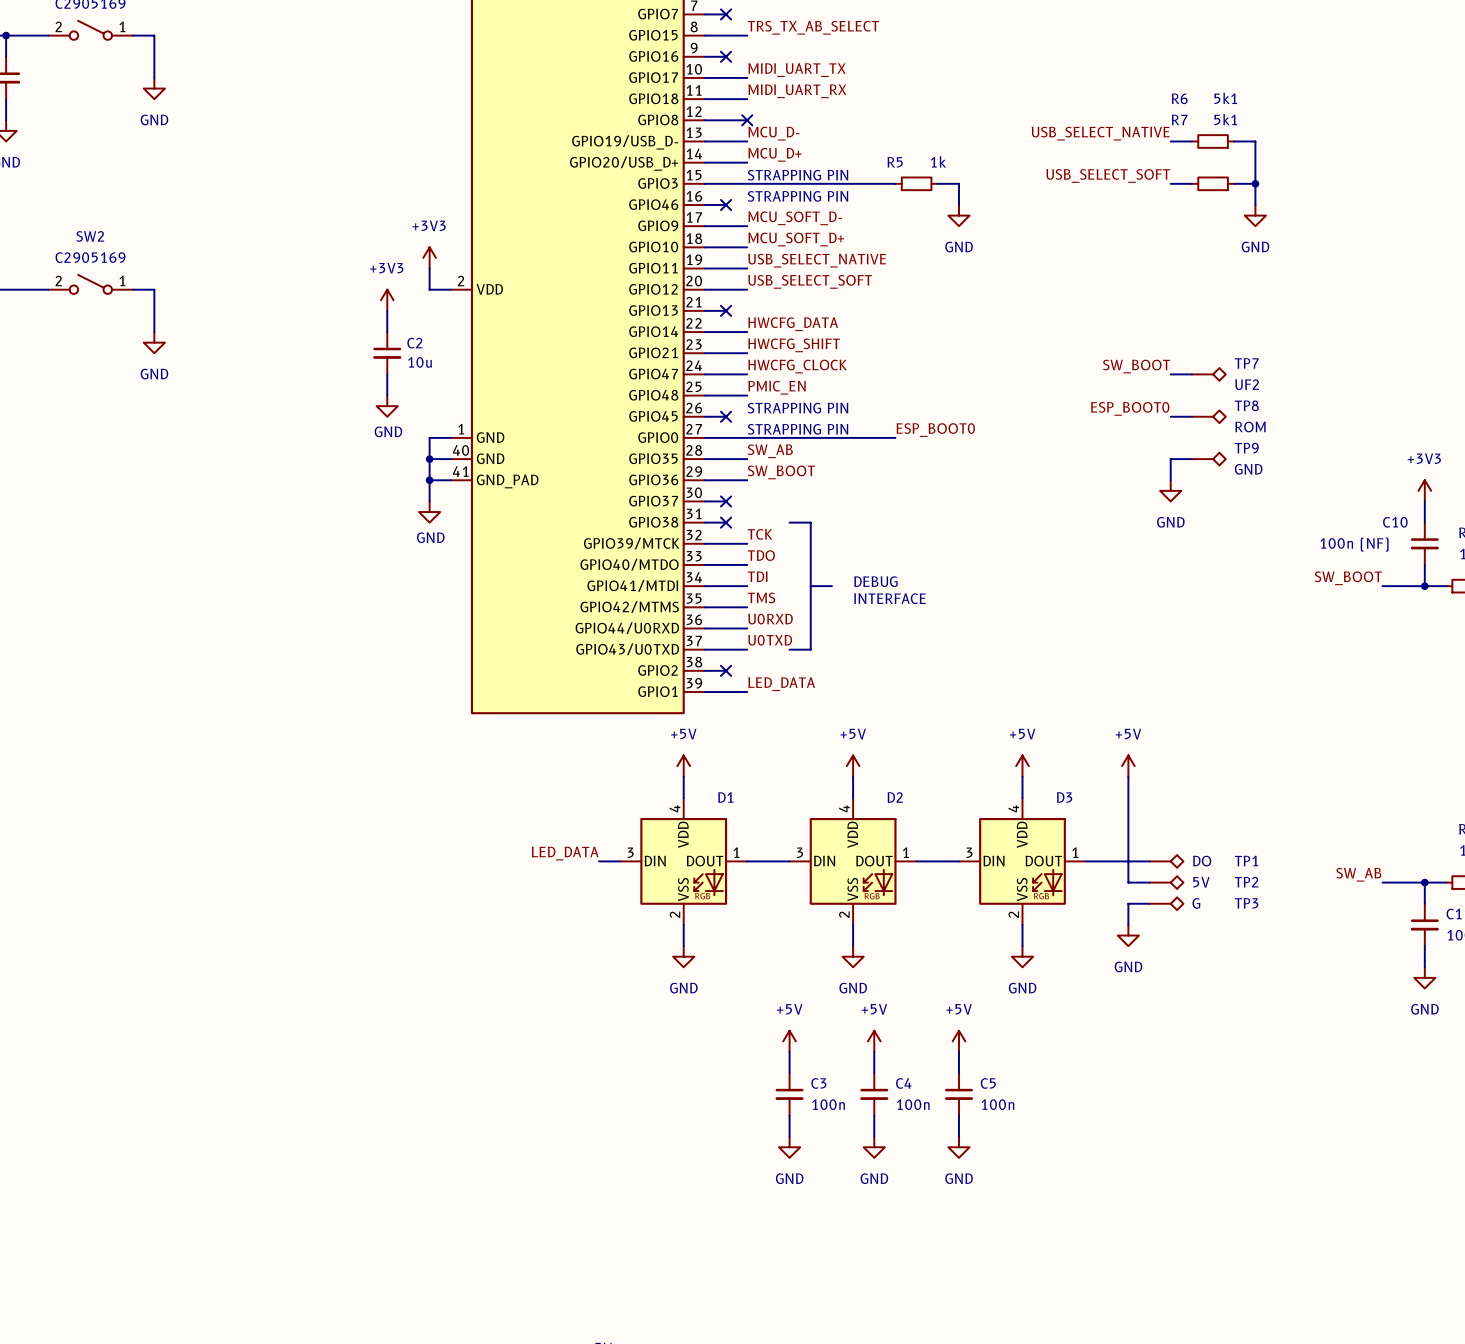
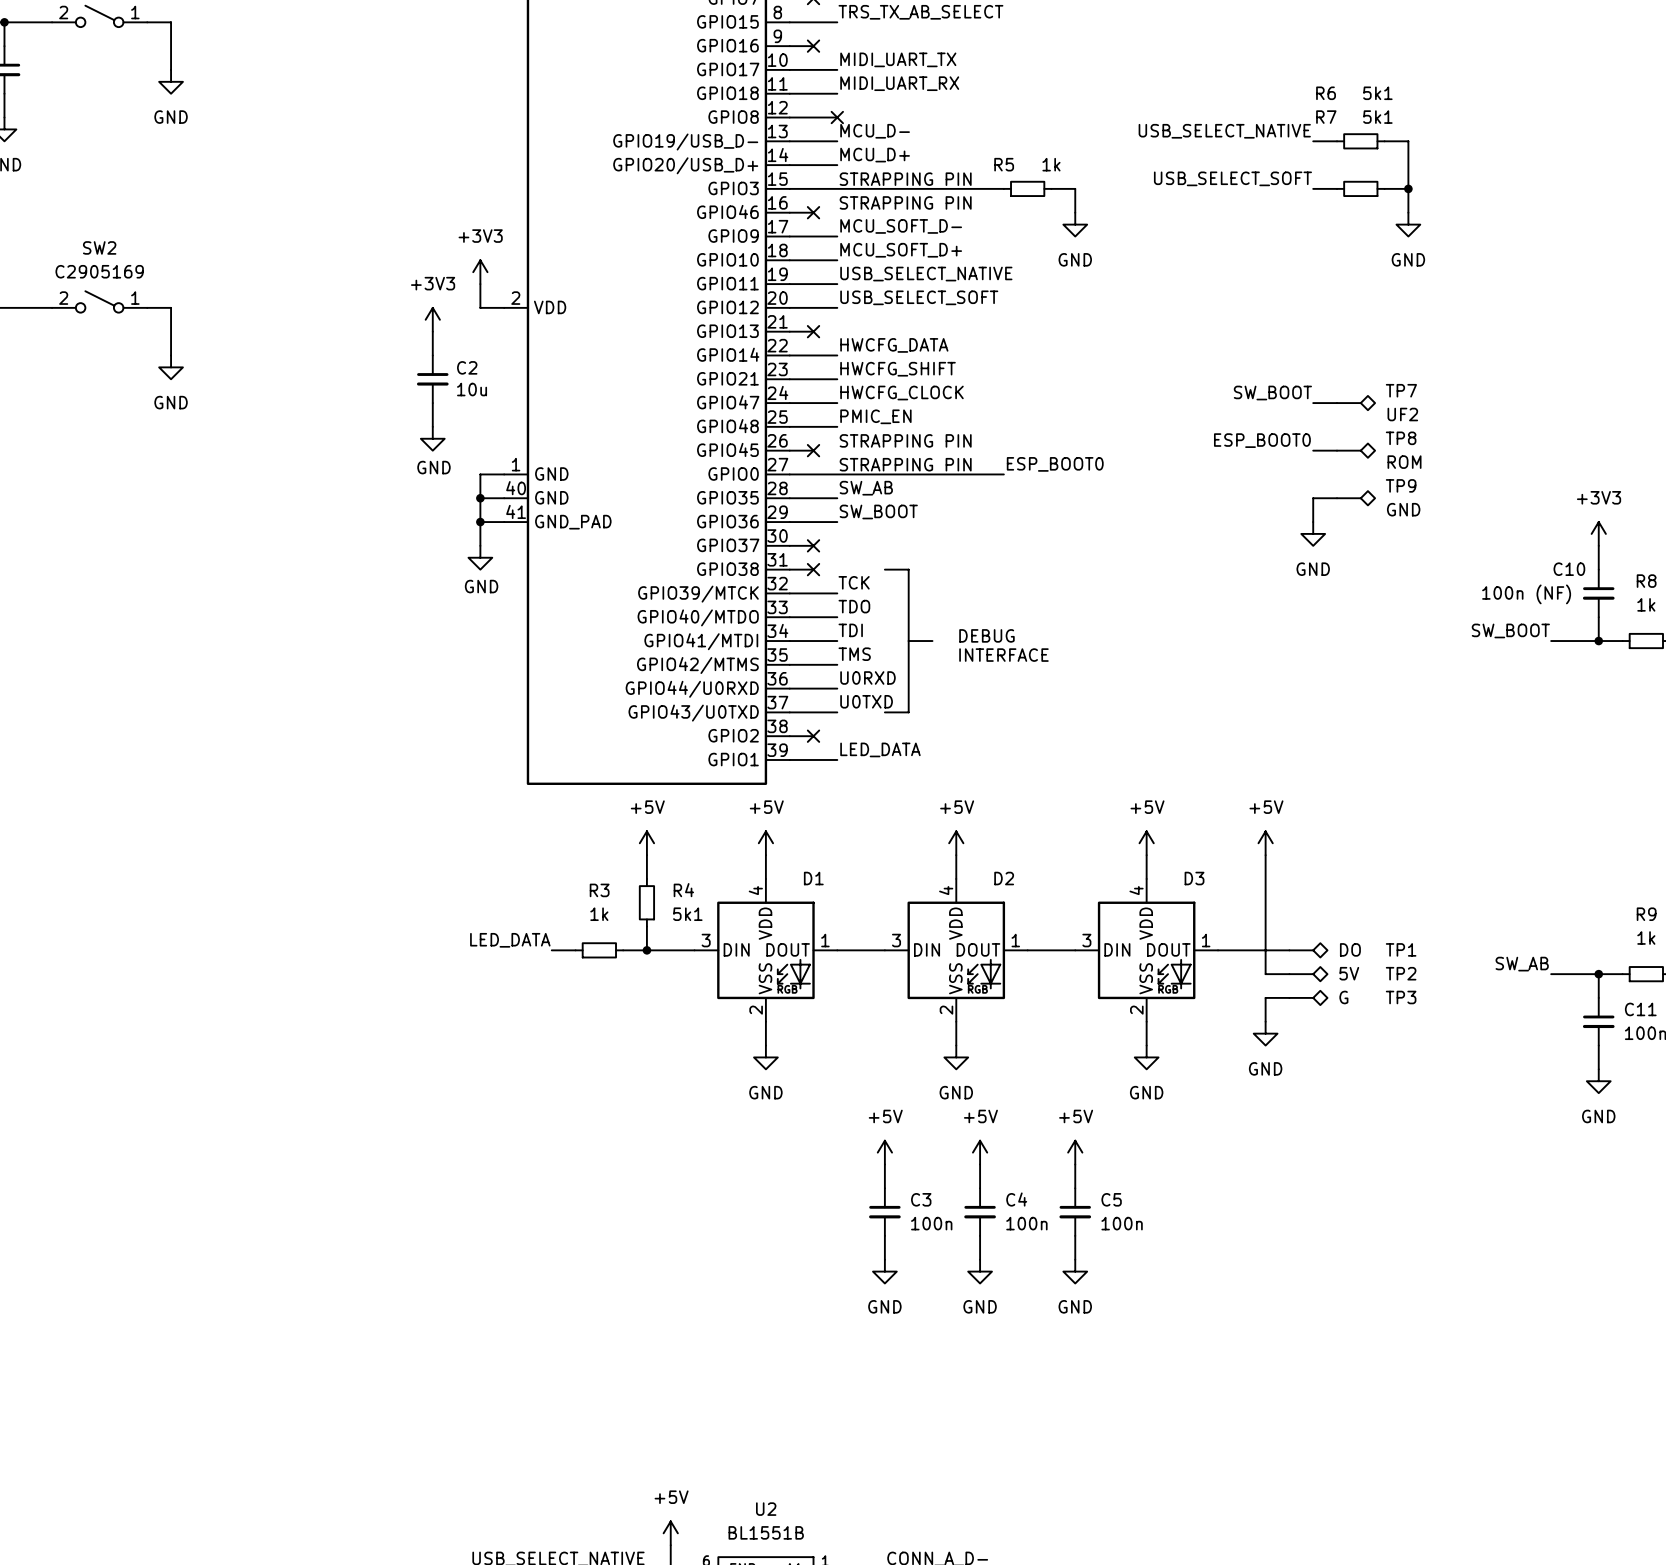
power symbol: none -> +5V (646, 843)
wire: none -> (646, 855) (646, 878)
R4: none -> 5k1 (646, 902)
wire: none -> (646, 926) (646, 950)
label position: LED_DATA (565, 853) -> LED_DATA (510, 940)
wire: none -> (551, 950) (575, 950)
R3: none -> 1k (599, 950)
wire: none -> (623, 950) (670, 950)
junction: none -> (646, 950)

